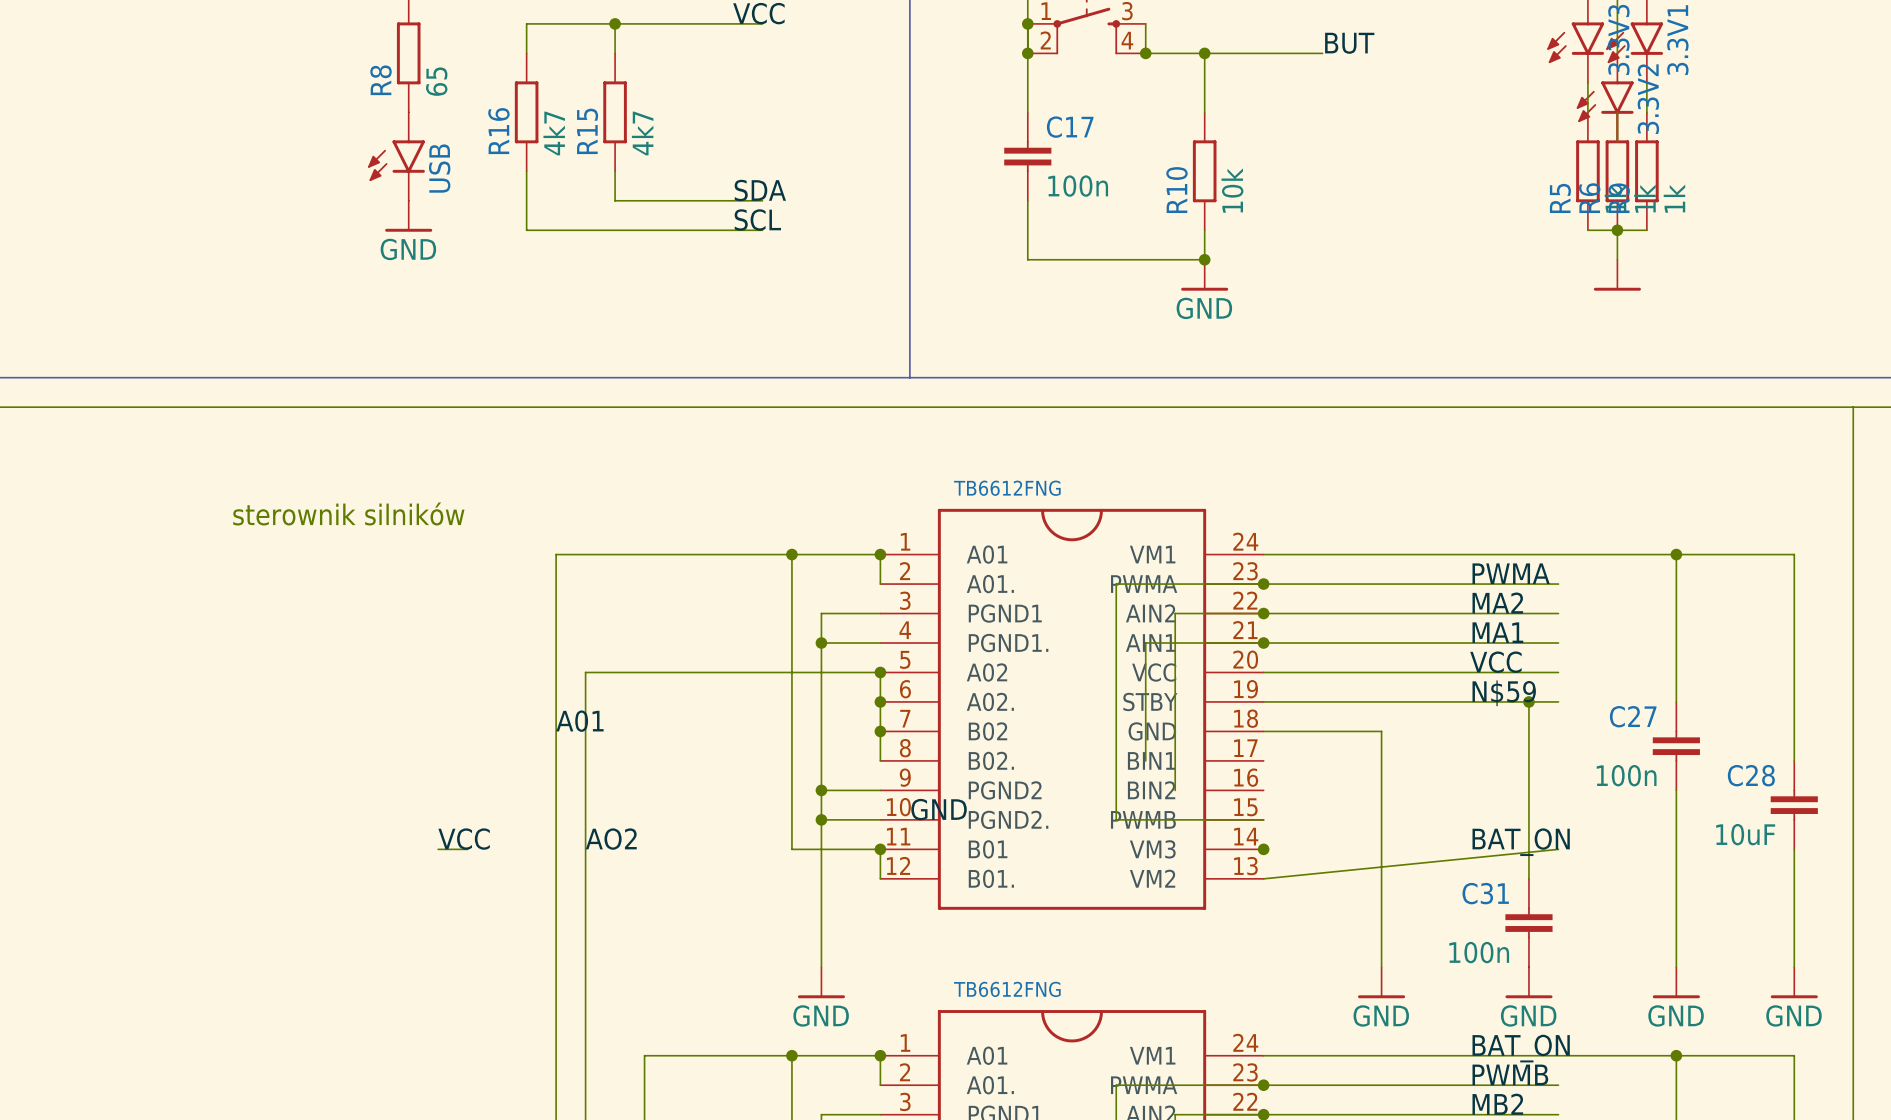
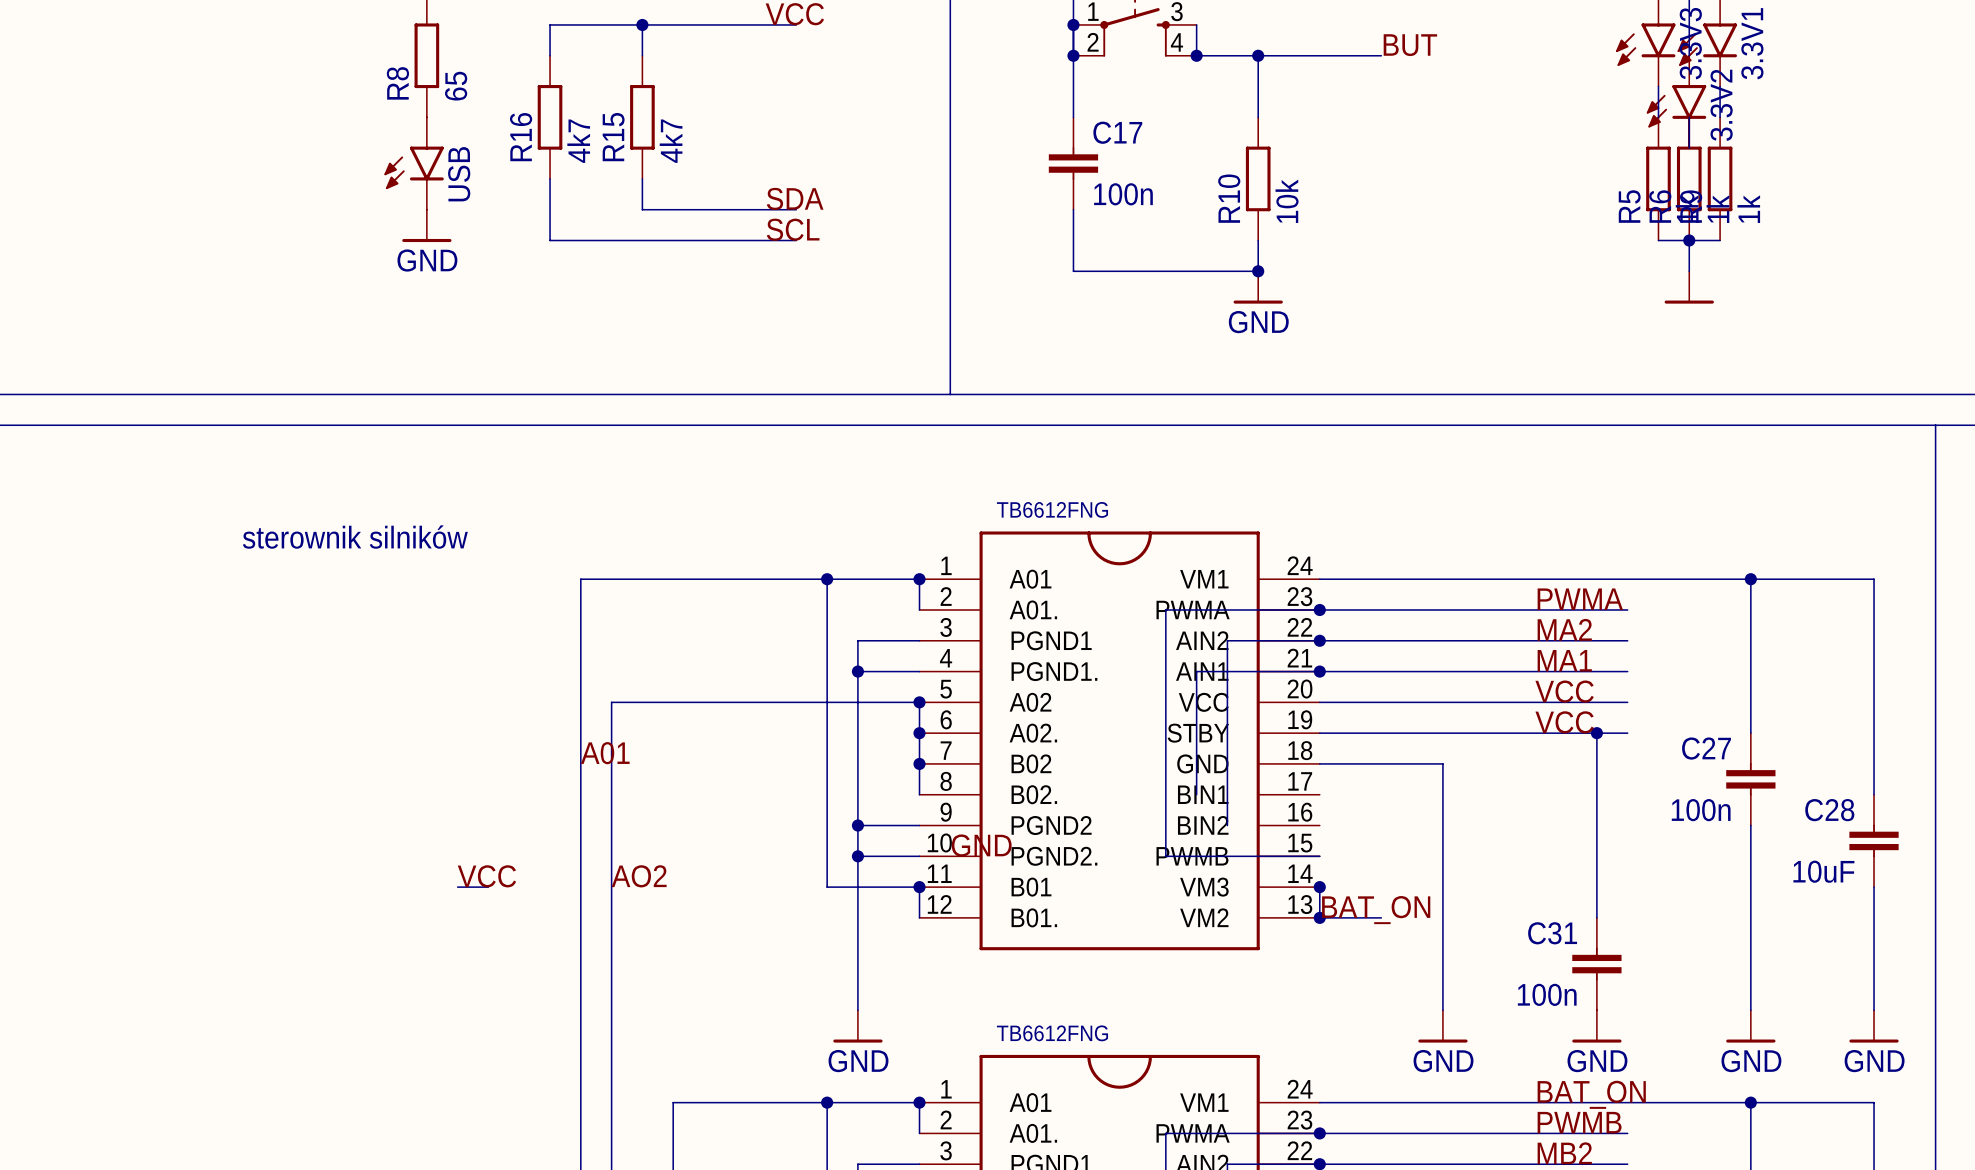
label: N$59 (1504, 693) -> VCC (1564, 722)
label position: BAT_ON (1521, 842) -> BAT_ON (1376, 910)
wire: none -> (1319, 887) (1319, 917) (1381, 917)
wire: (1558, 849) (1263, 878) -> none
junction: none -> (1319, 917)

